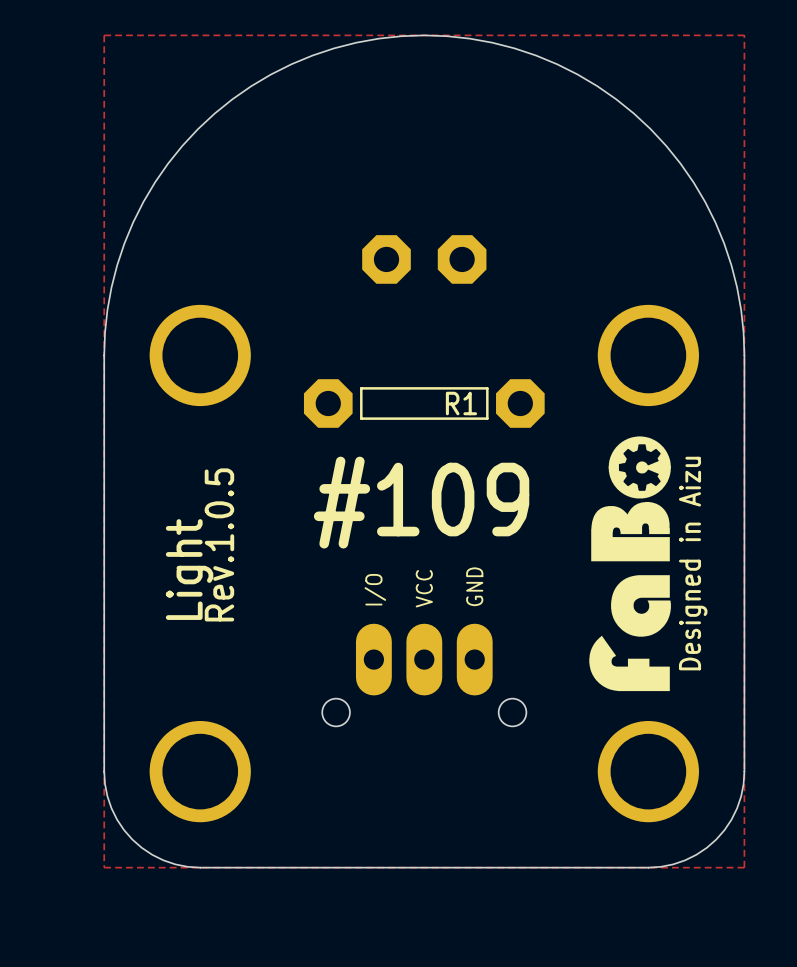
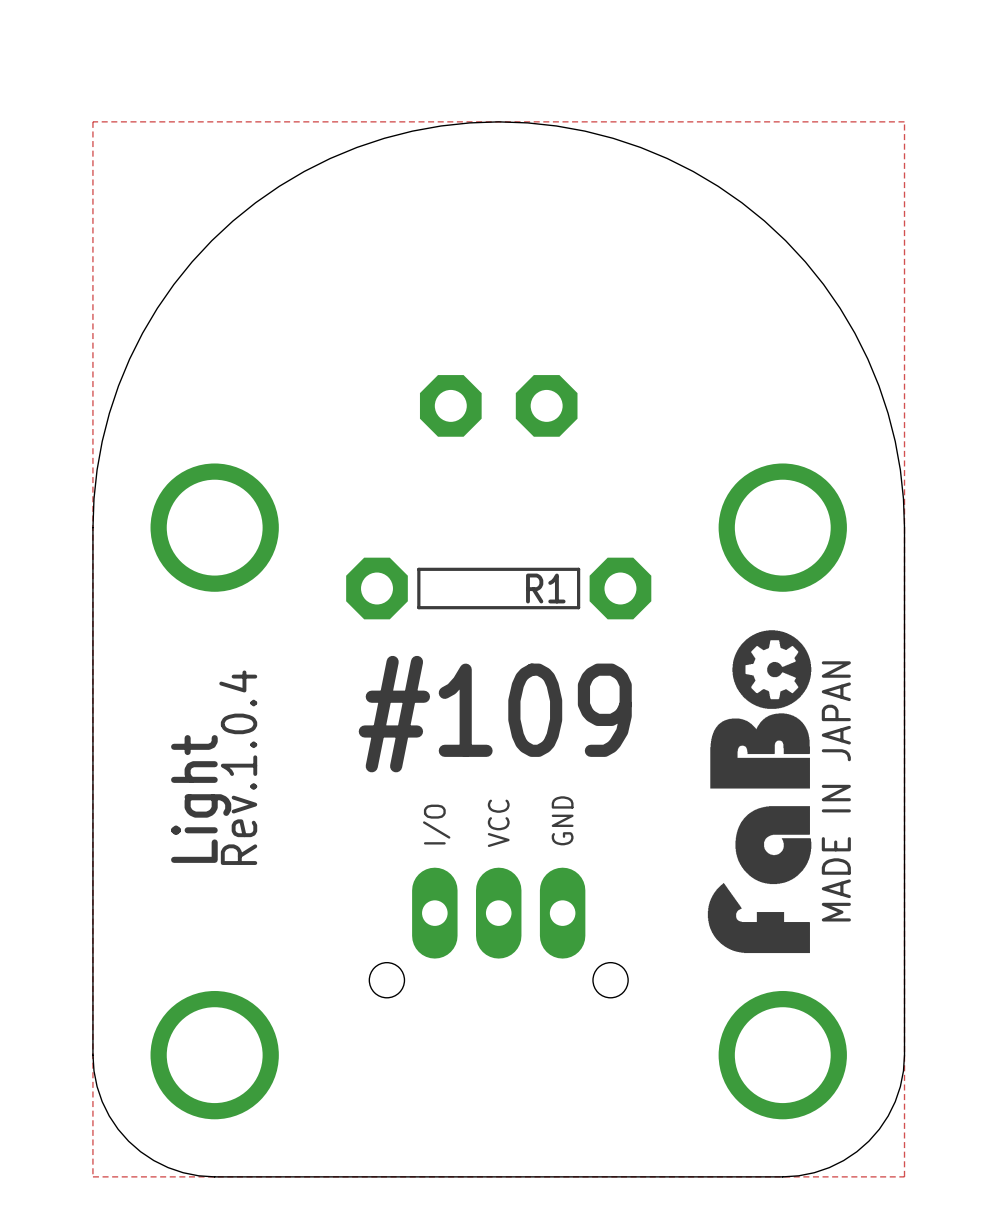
text: Rev.1.0.5 (219, 544) -> Rev.1.0.4 (238, 767)
text: Designed in Aizu (693, 563) -> MADE IN JAPAN (836, 791)

